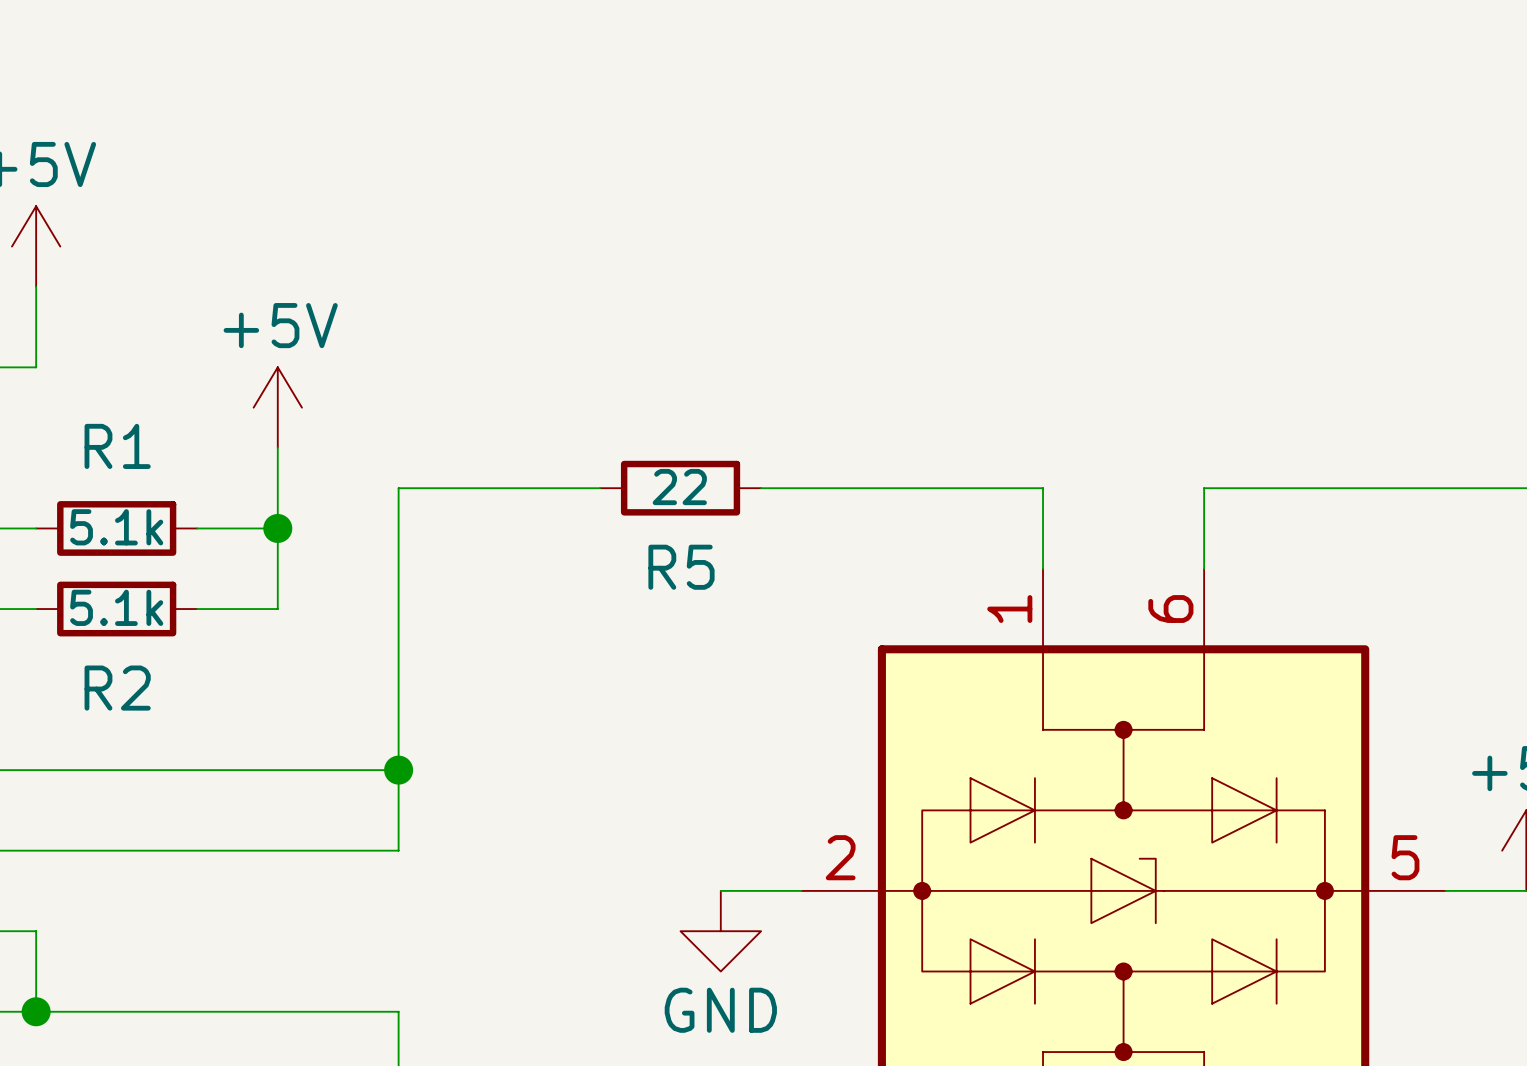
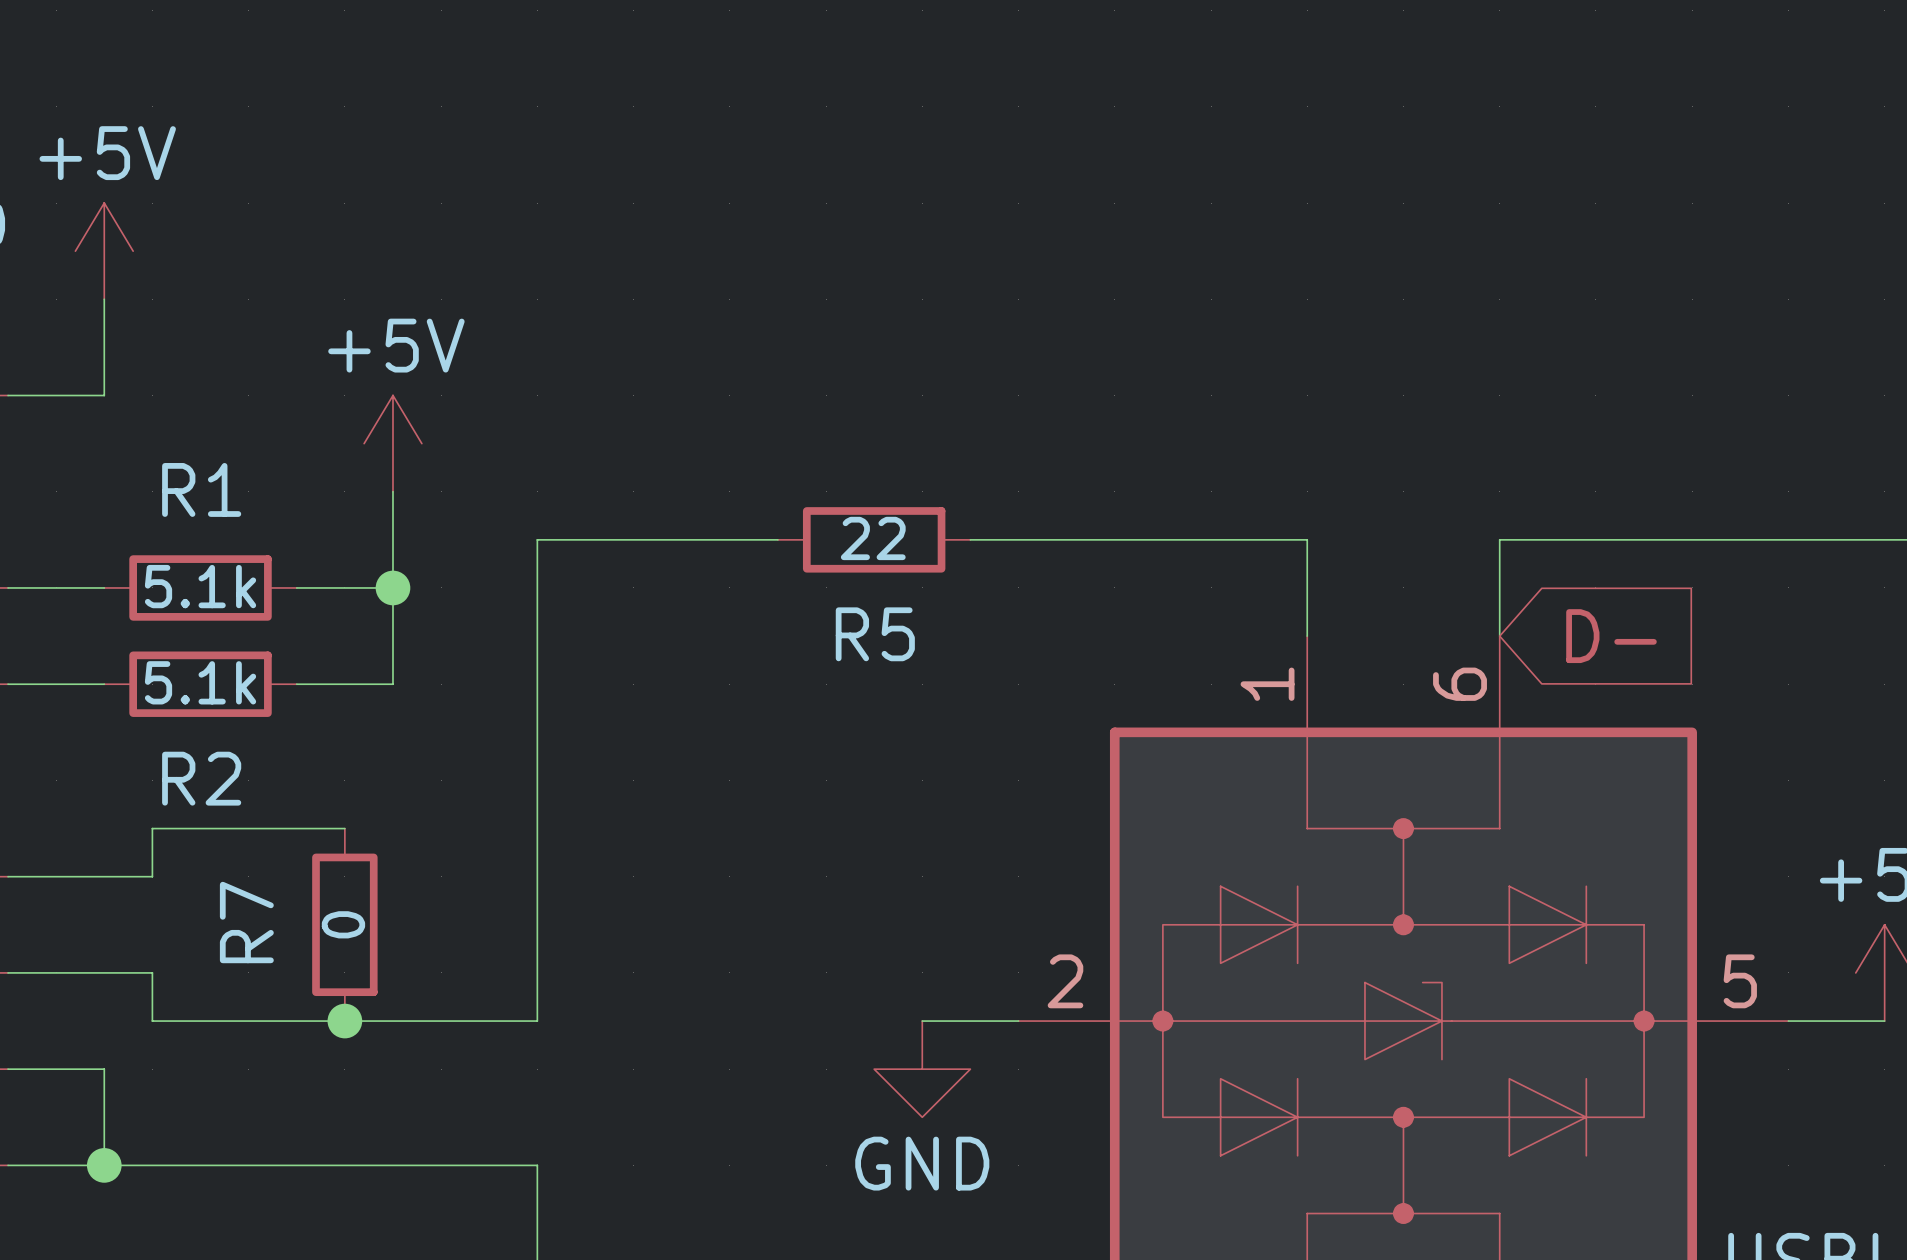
global label: none -> D- (1611, 636)
wire: (76, 770) (398, 770) -> (152, 876) (152, 828) (344, 828)
junction: (398, 770) -> none
R7: none -> 0 (344, 924)
wire: (76, 850) (398, 850) -> (152, 972) (152, 1021) (537, 1021) (537, 972)
junction: none -> (344, 1021)

